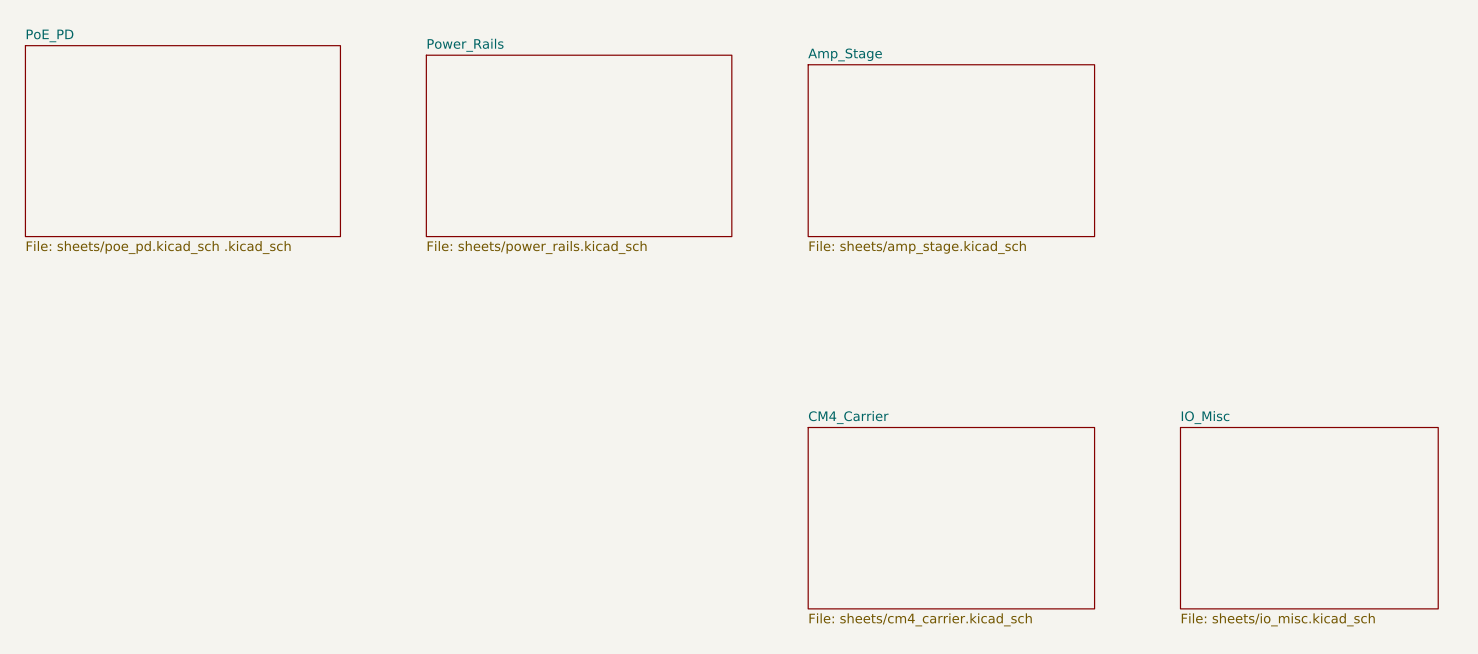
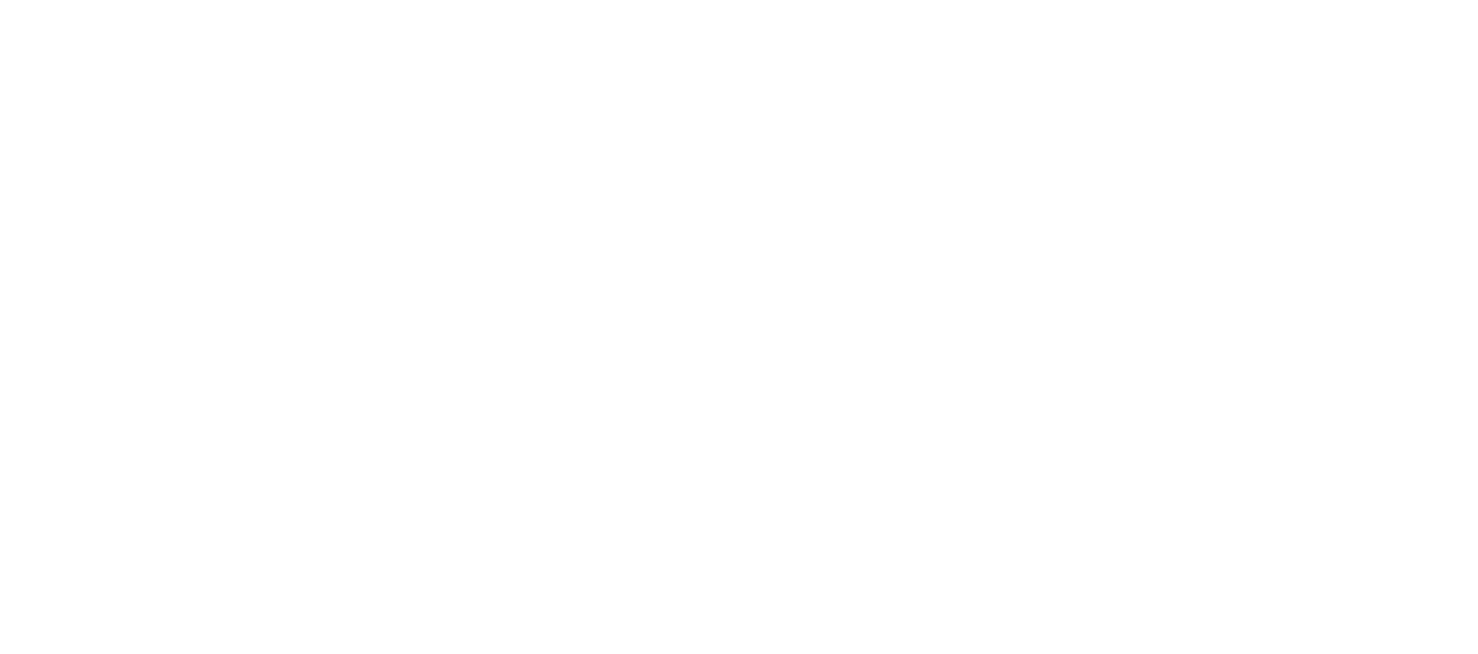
sheet PoE_PD: File: sheets/poe_pd.kicad_sch .kicad_sch (182, 141) -> none
sheet Power_Rails: File: sheets/power_rails.kicad_sch (579, 145) -> none
sheet Amp_Stage: File: sheets/amp_stage.kicad_sch (951, 150) -> none
sheet CM4_Carrier: File: sheets/cm4_carrier.kicad_sch (951, 518) -> none
sheet IO_Misc: File: sheets/io_misc.kicad_sch (1309, 518) -> none

